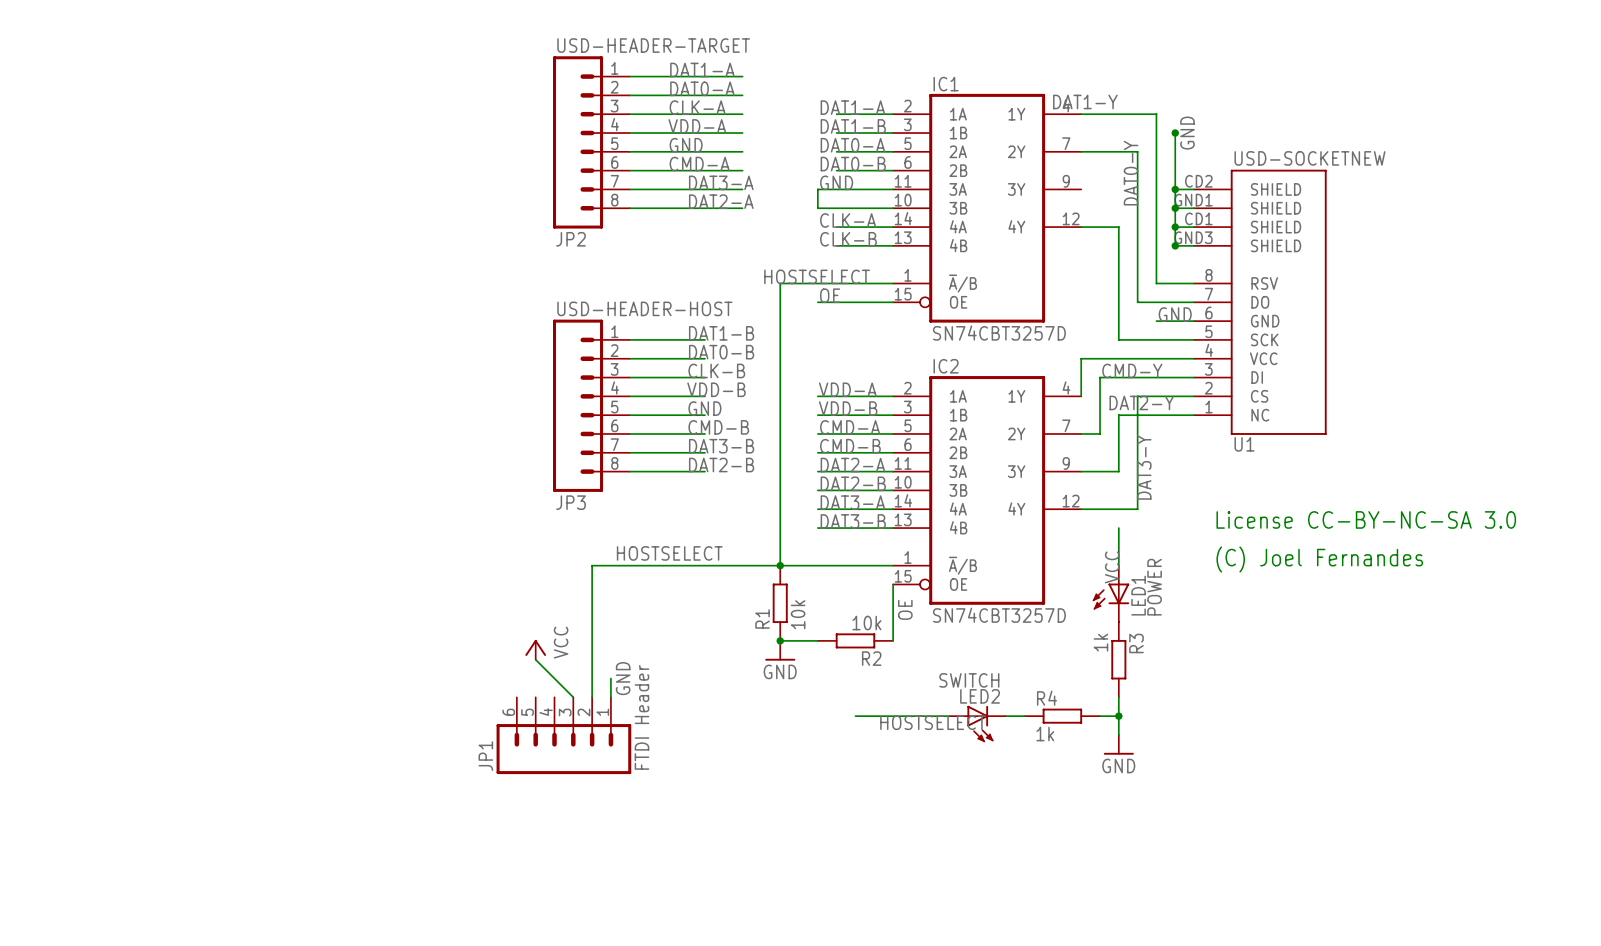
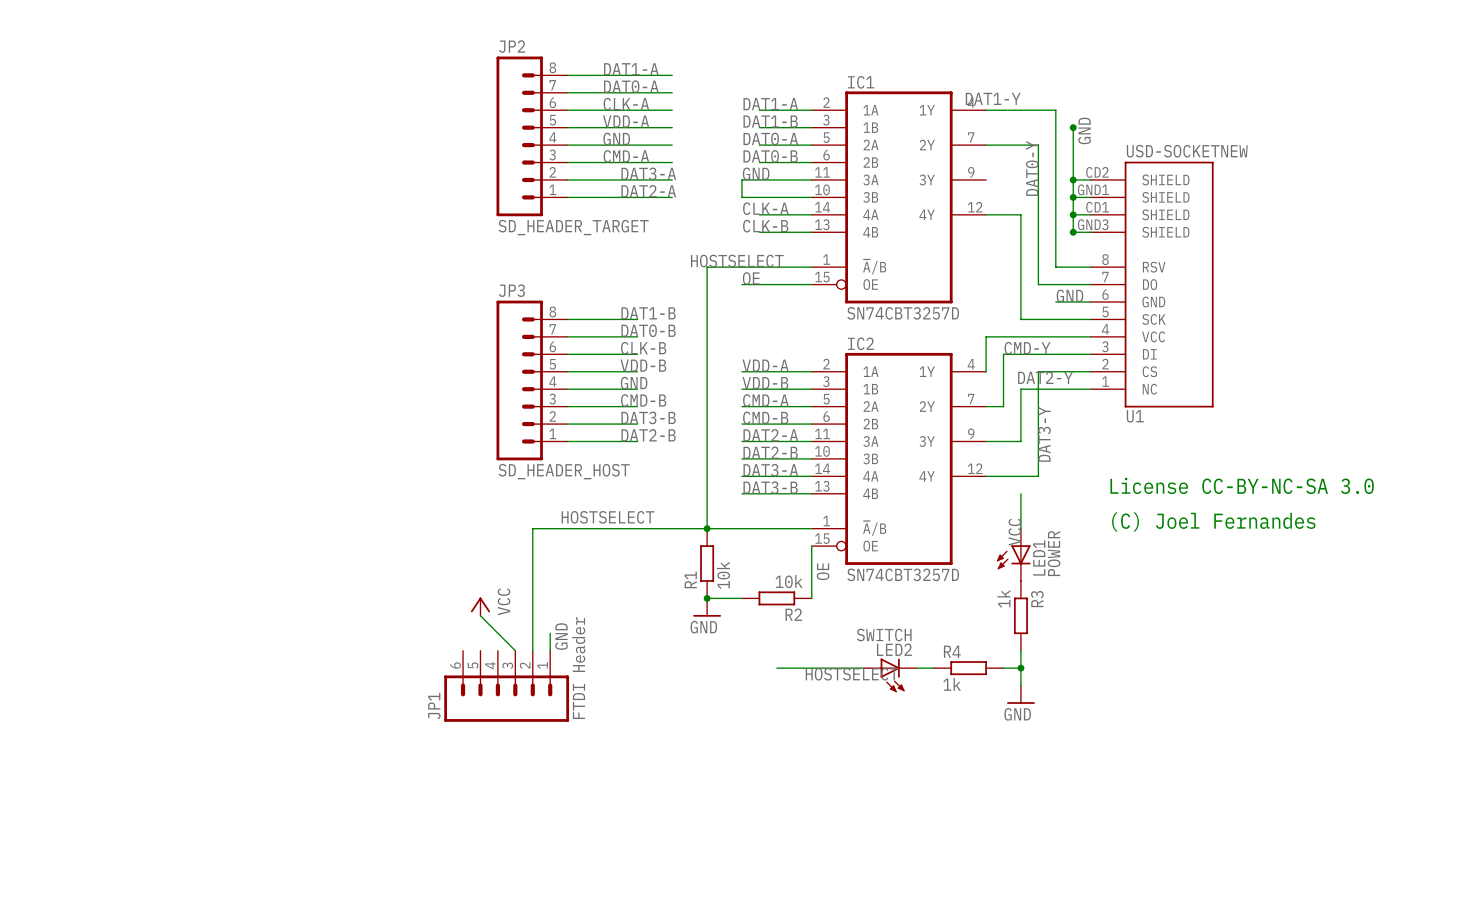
JP2 value: USD-HEADER-TARGET (653, 45) -> SD_HEADER_TARGET (573, 227)
JP2 flip: as is (578, 142) -> up-down (519, 136)
JP3 value: USD-HEADER-HOST (644, 308) -> SD_HEADER_HOST (564, 471)
JP3 flip: as is (578, 405) -> up-down (519, 380)

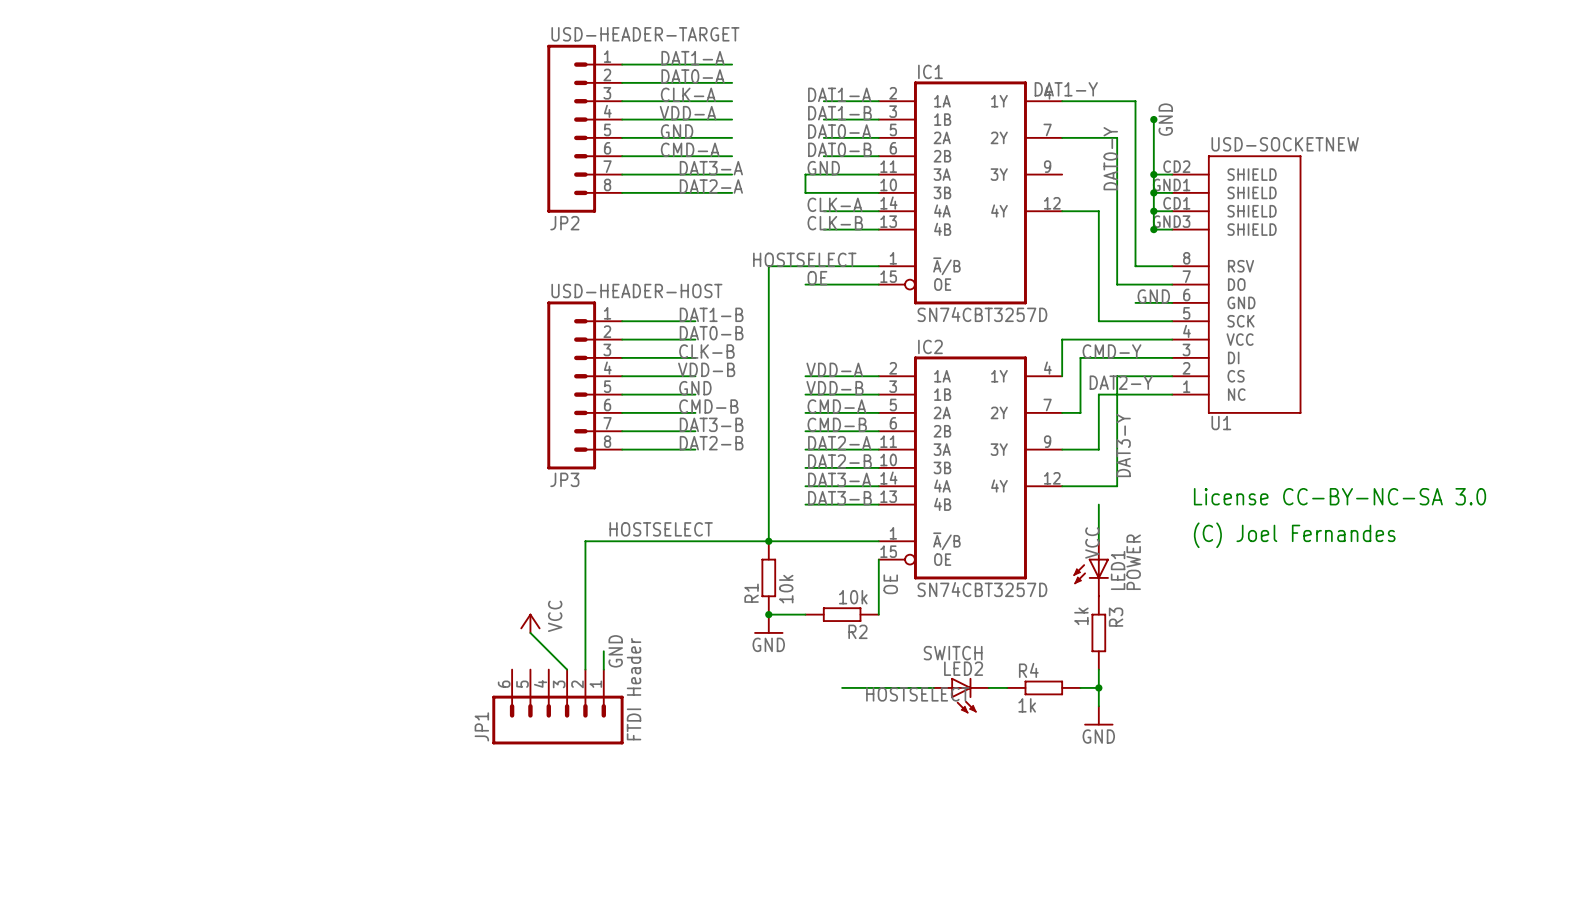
JP2 flip: as is (519, 136) -> up-down (571, 128)
JP2 value: SD_HEADER_TARGET (573, 227) -> USD-HEADER-TARGET (645, 34)
JP3 flip: as is (519, 380) -> up-down (571, 385)
JP3 value: SD_HEADER_HOST (564, 471) -> USD-HEADER-HOST (636, 291)

